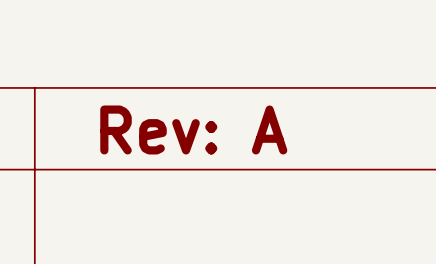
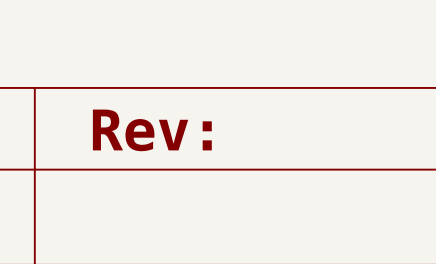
title block: Rev: A (193, 129) -> Rev: (152, 130)

